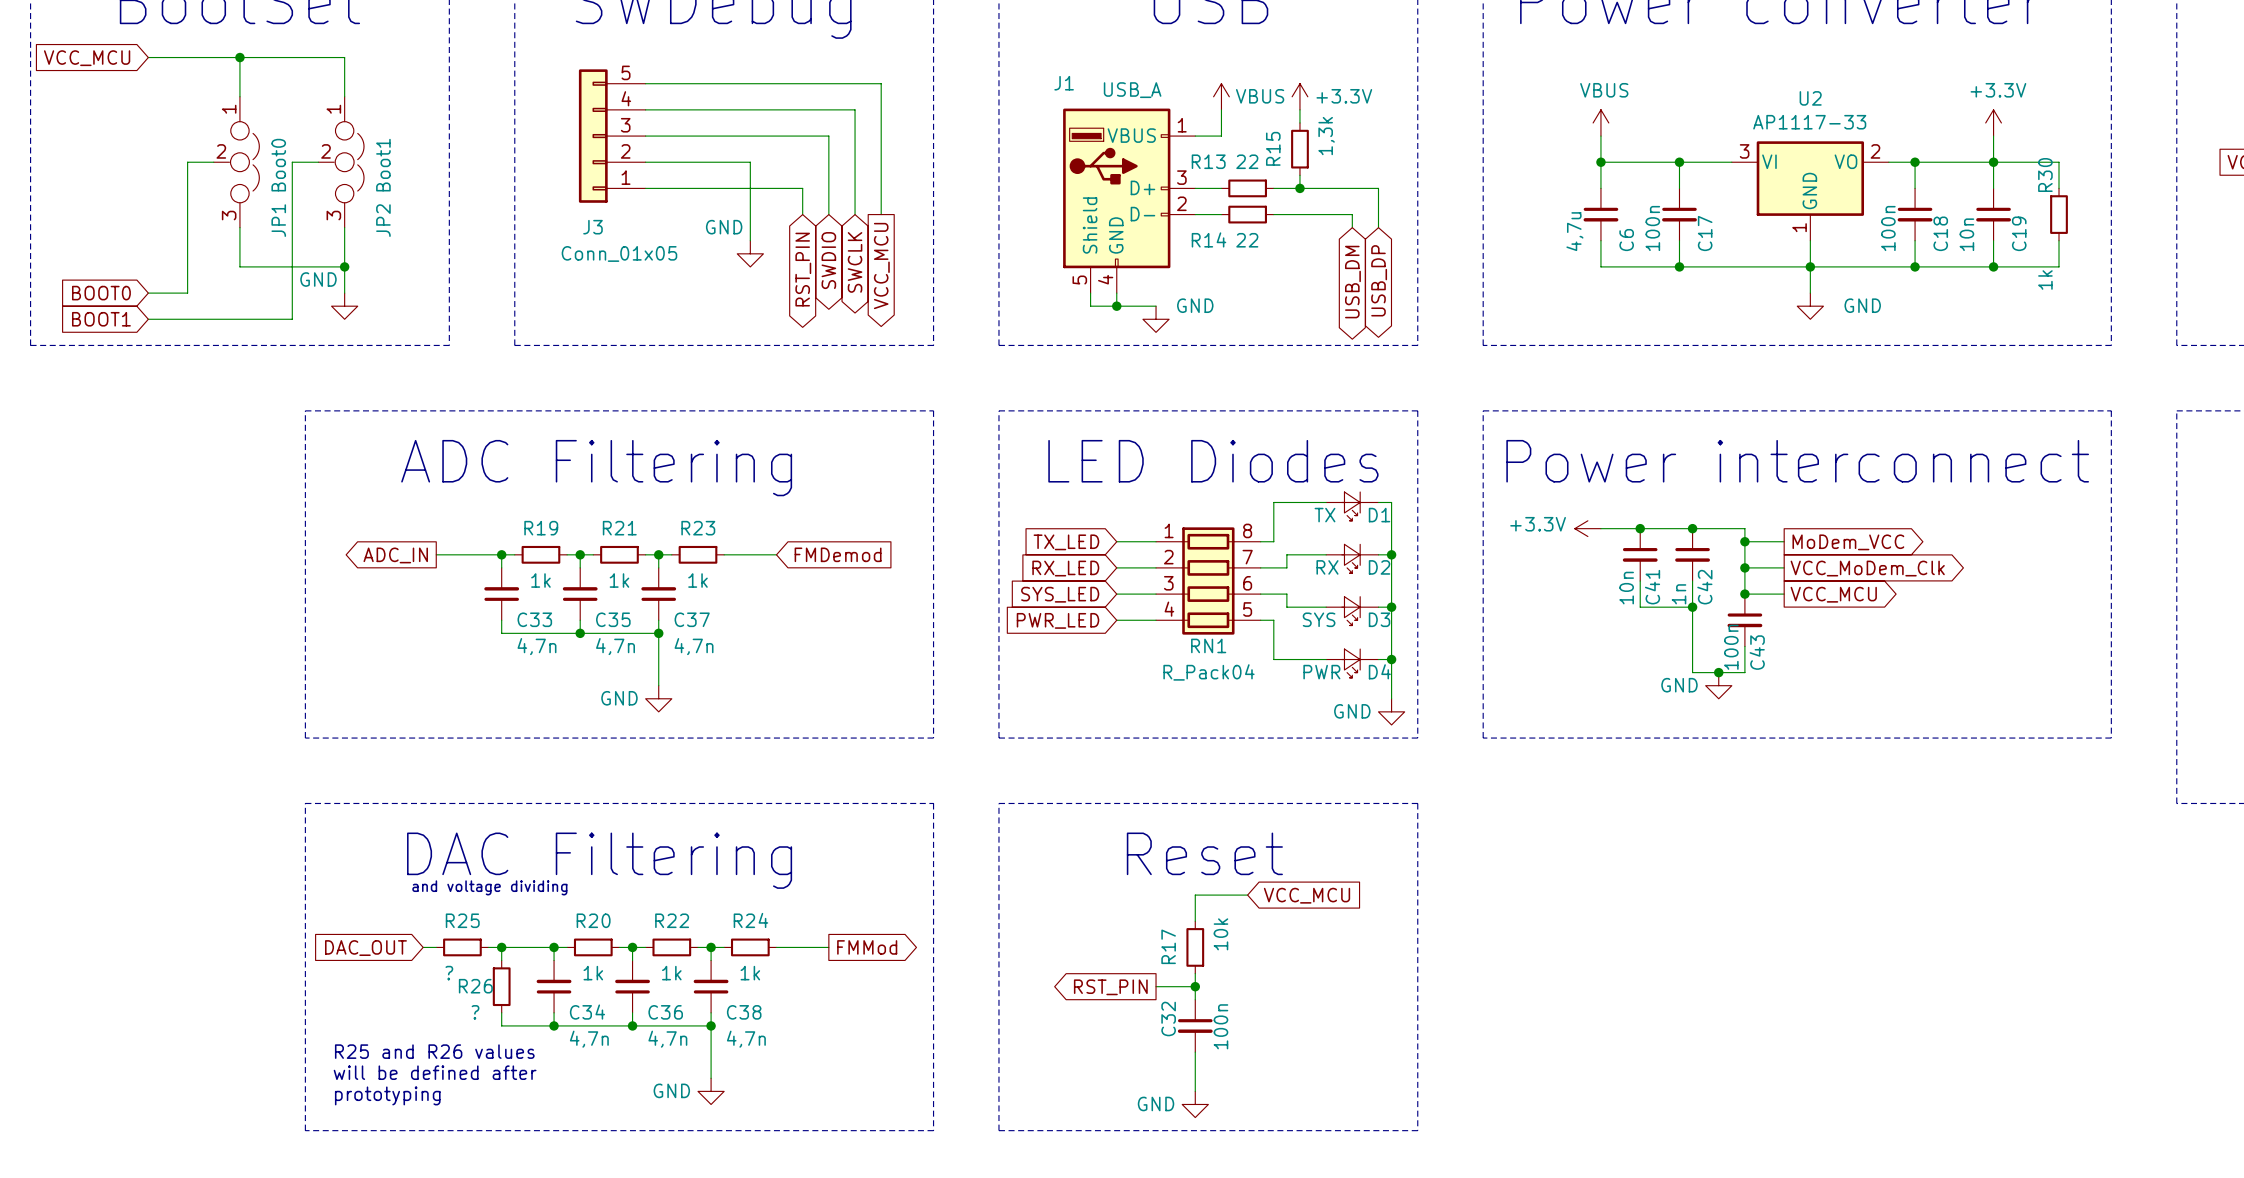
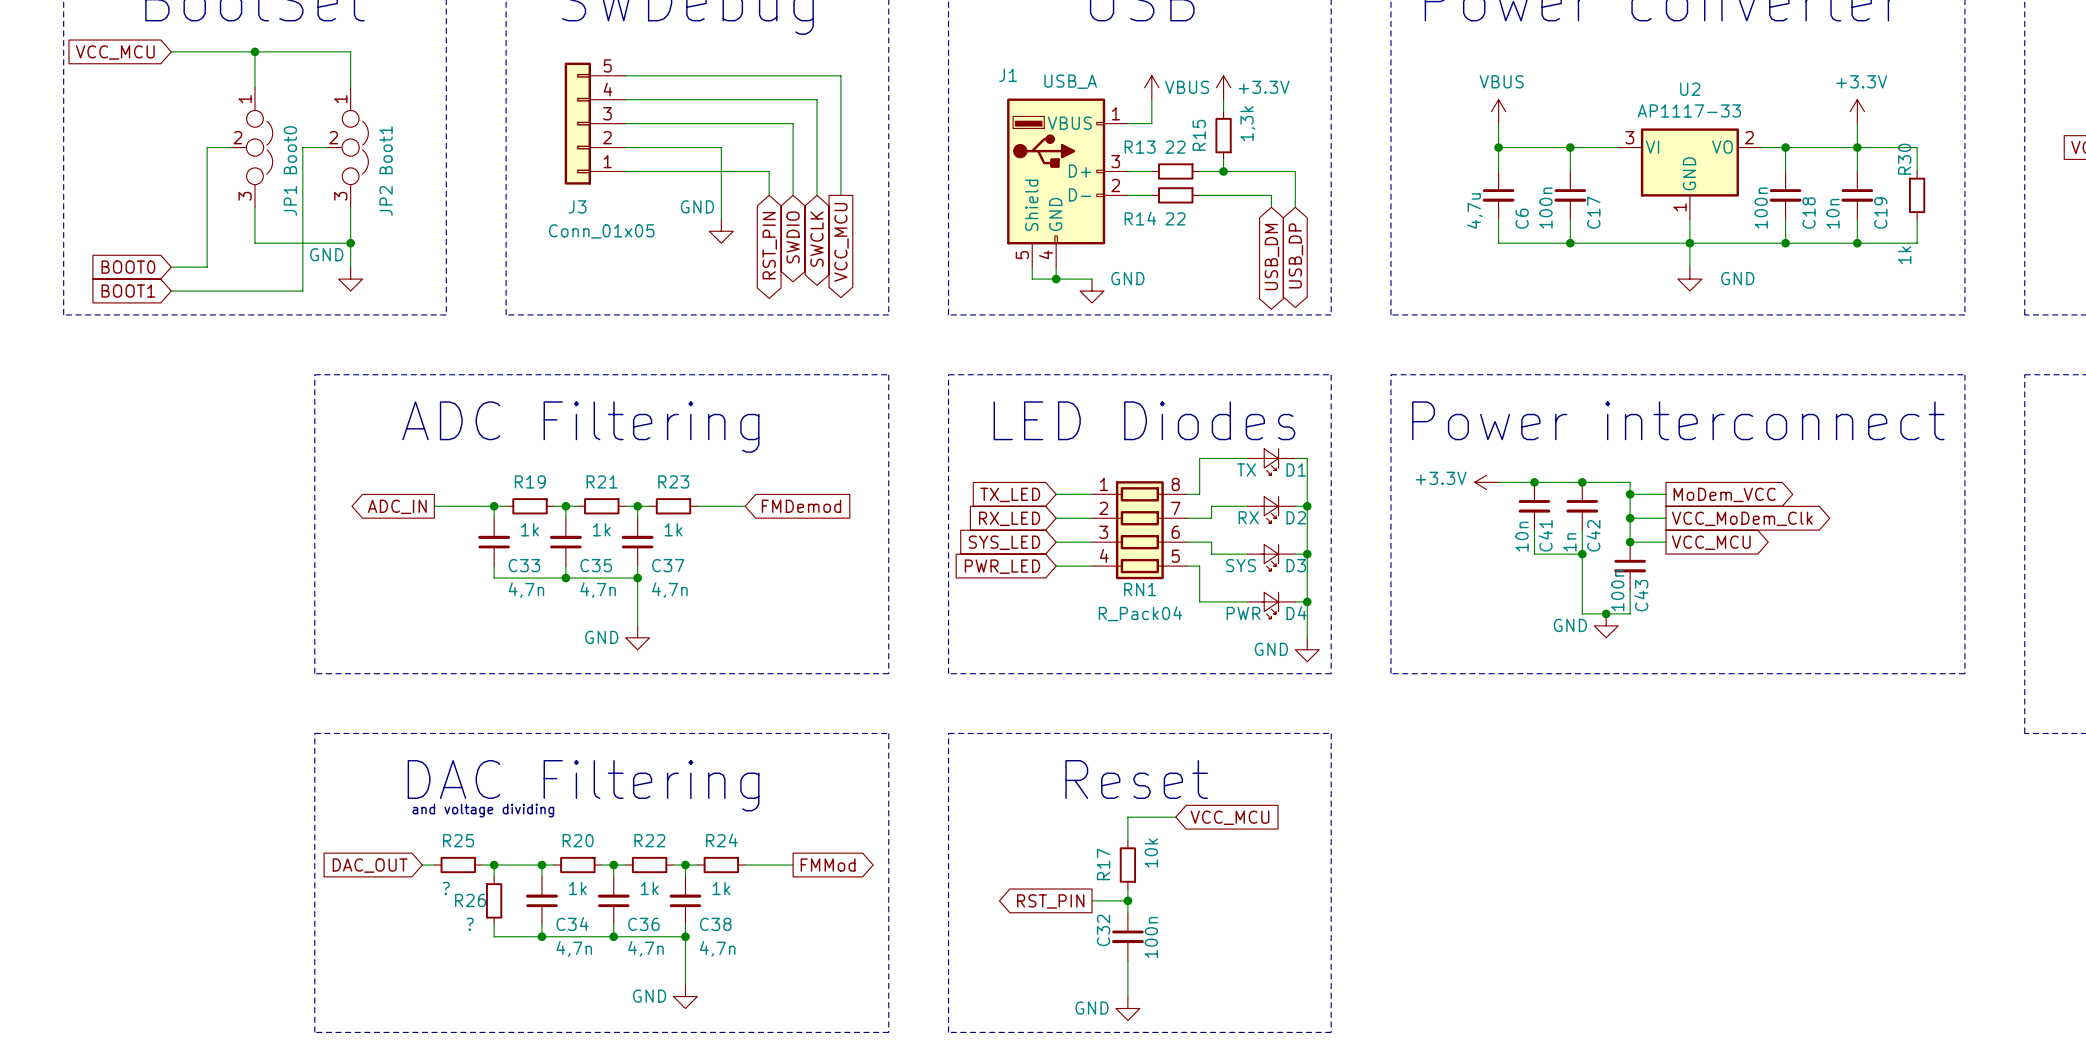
text: R25 and R26 values (434, 1051) -> none
text: will be defined after (435, 1072) -> none
text: prototyping (387, 1095) -> none

